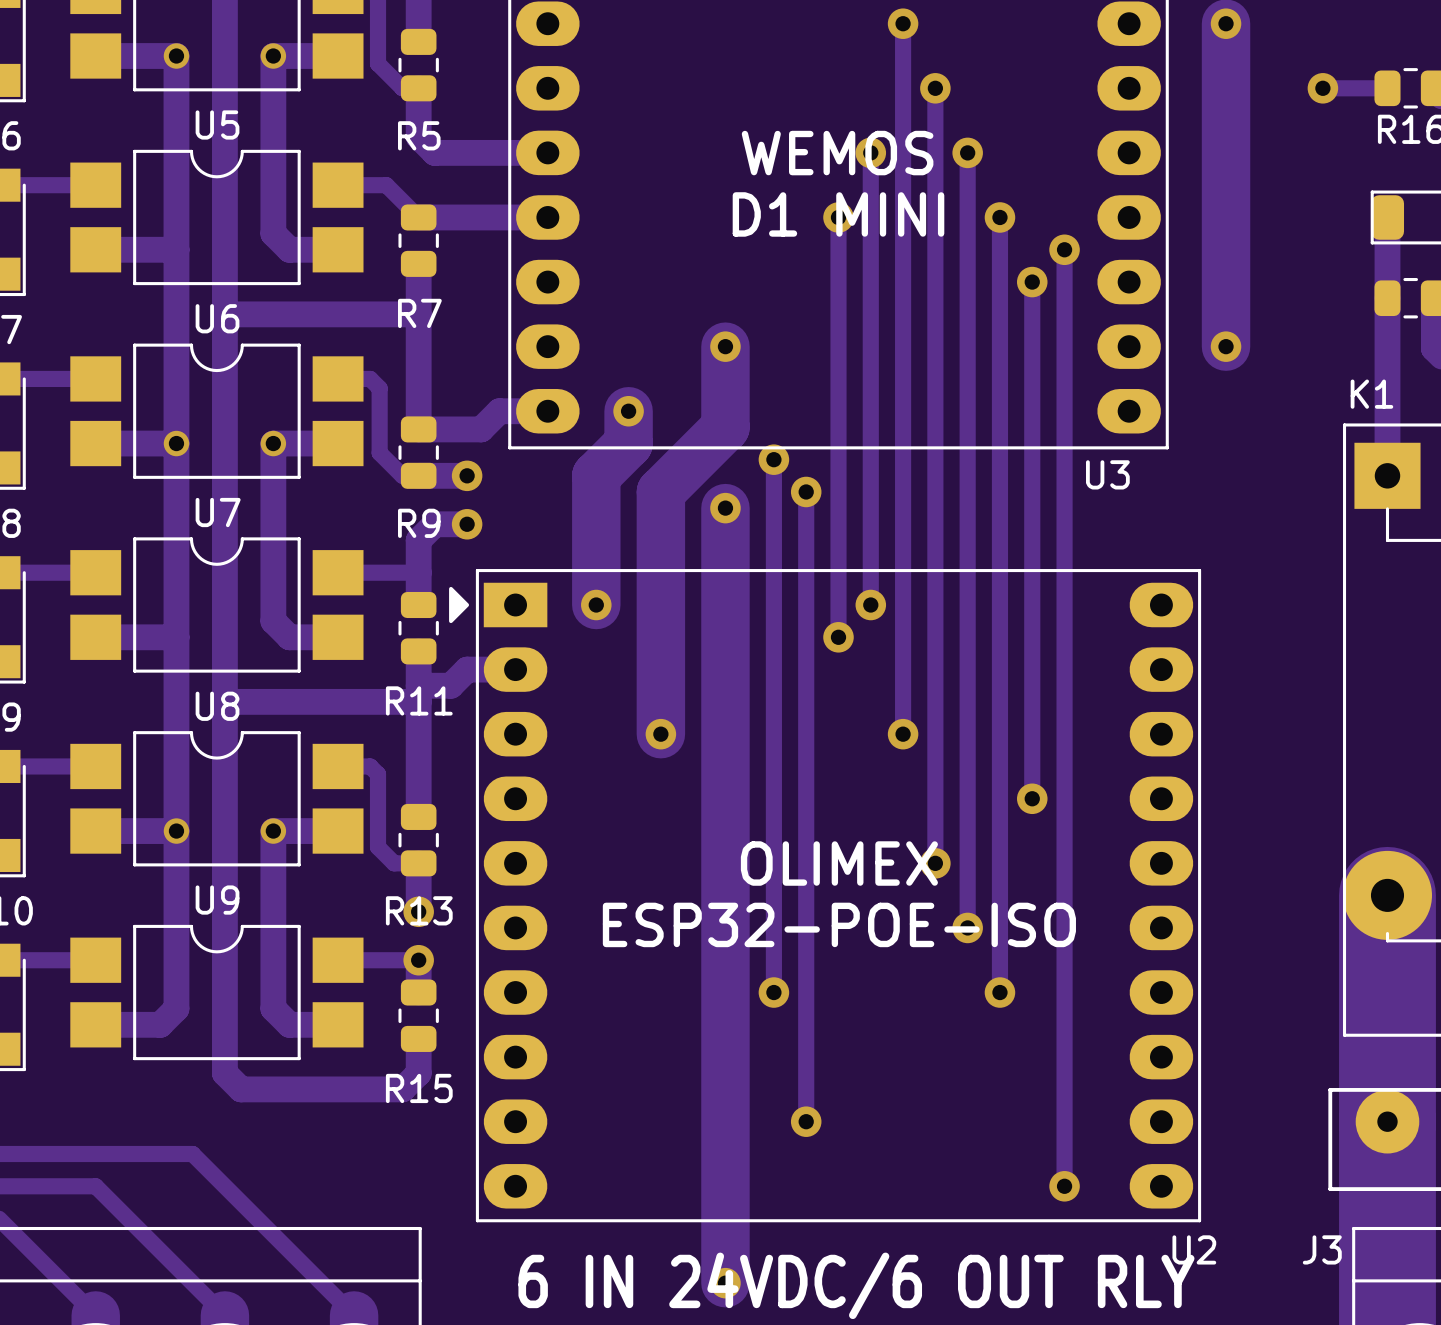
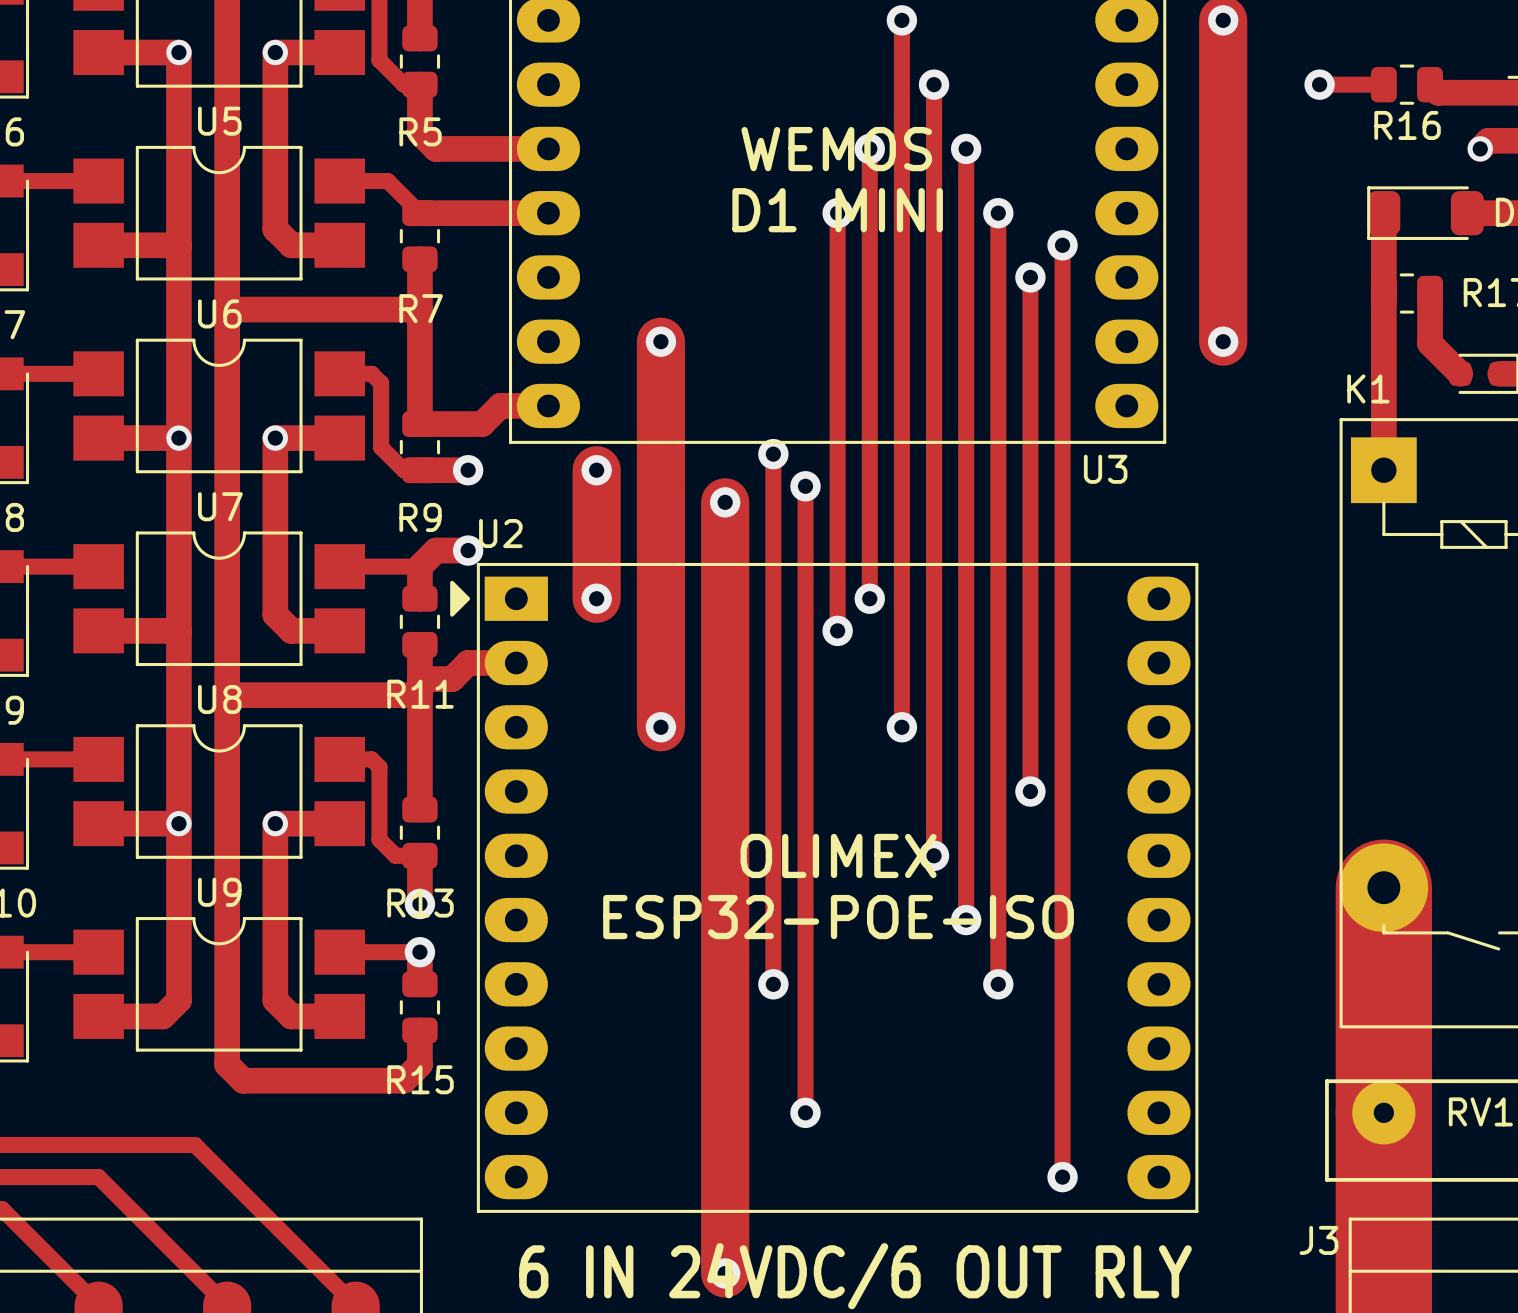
via: none -> (660, 341)
track: (725, 346) (725, 427) (660, 491) -> (660, 341) (660, 486)
via: (725, 346) -> none
track: (628, 411) (628, 443) (596, 475) -> none
via: (628, 411) -> none
via: none -> (596, 470)
track: (467, 524) (434, 524) (418, 540) (418, 572) -> (468, 550) (436, 550) (419, 566)
via position: (467, 524) -> (468, 550)
U2 name position: U2 (1194, 1249) -> U2 (500, 533)

